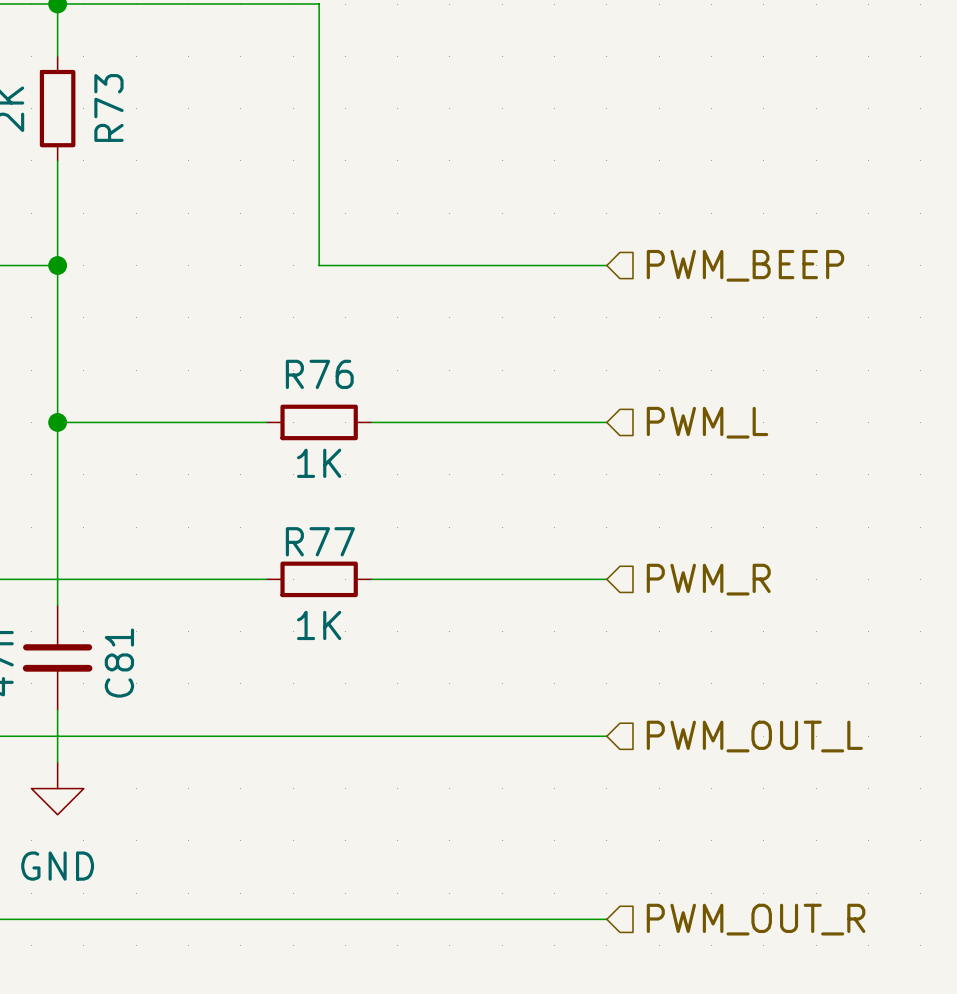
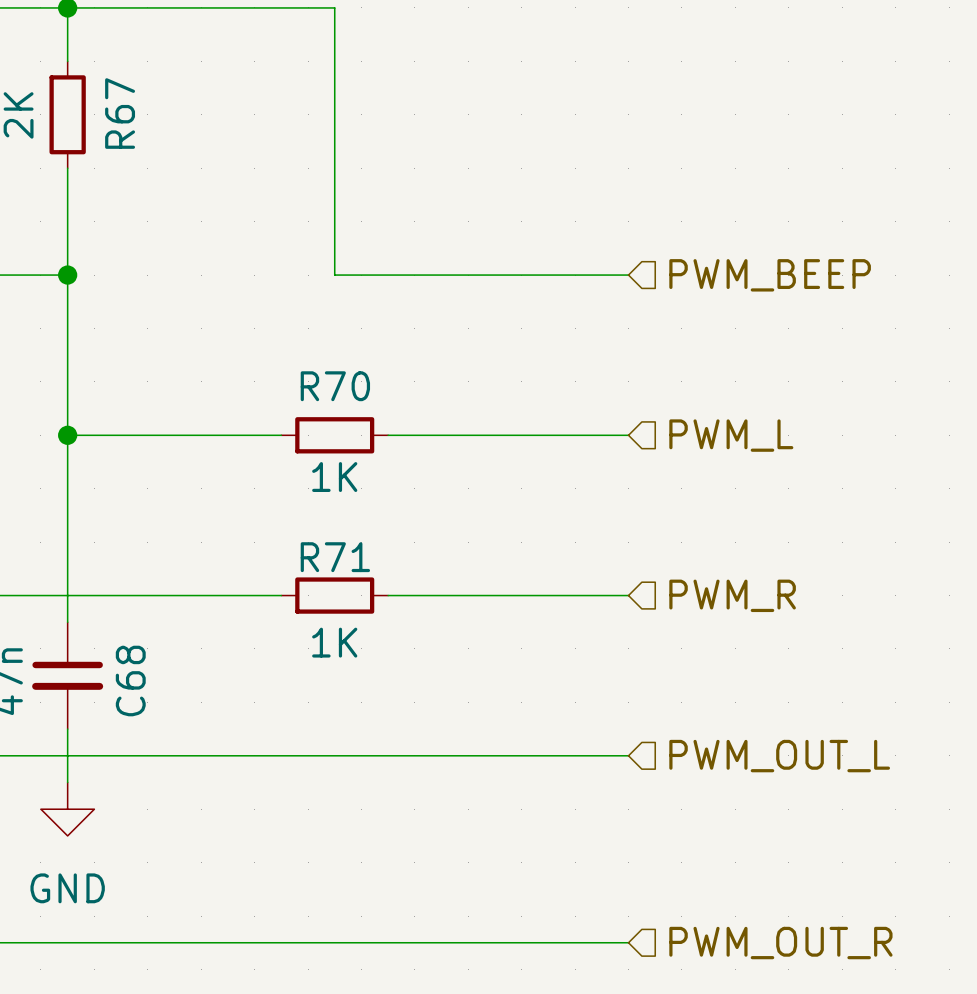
R73 name: R73 (108, 107) -> R67 (120, 113)
R76 name: R76 (319, 374) -> R70 (335, 386)
R77 name: R77 (320, 541) -> R71 (335, 557)
C81 name: C81 (119, 663) -> C68 (130, 681)

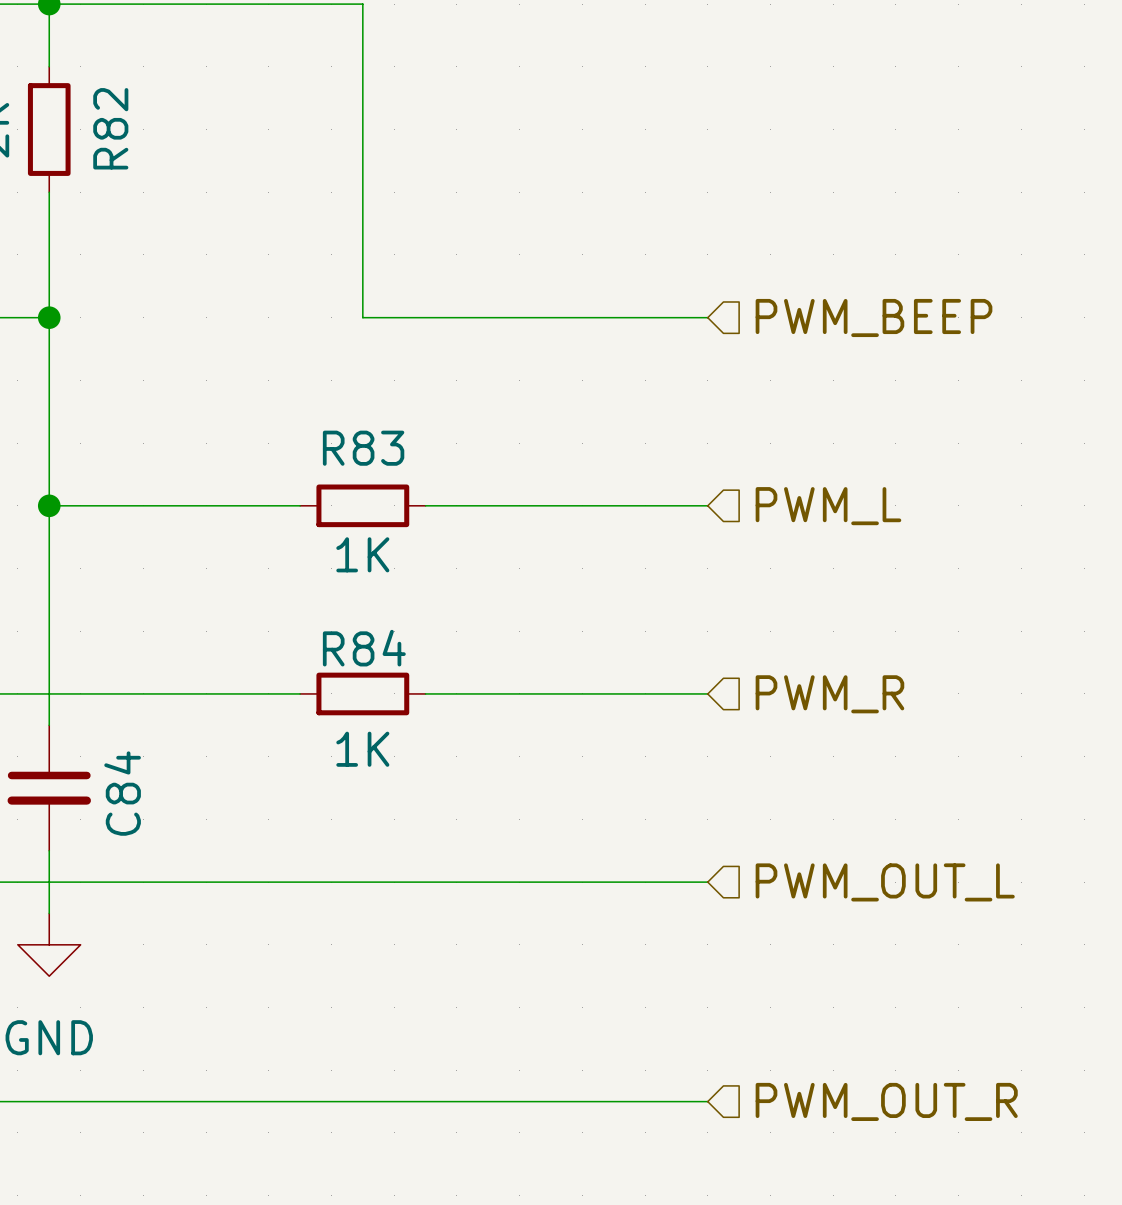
R67 name: R67 (120, 113) -> R82 (110, 128)
R70 name: R70 (335, 386) -> R83 (363, 448)
R71 name: R71 (335, 557) -> R84 (364, 648)
C68 name: C68 (130, 681) -> C84 (122, 793)

